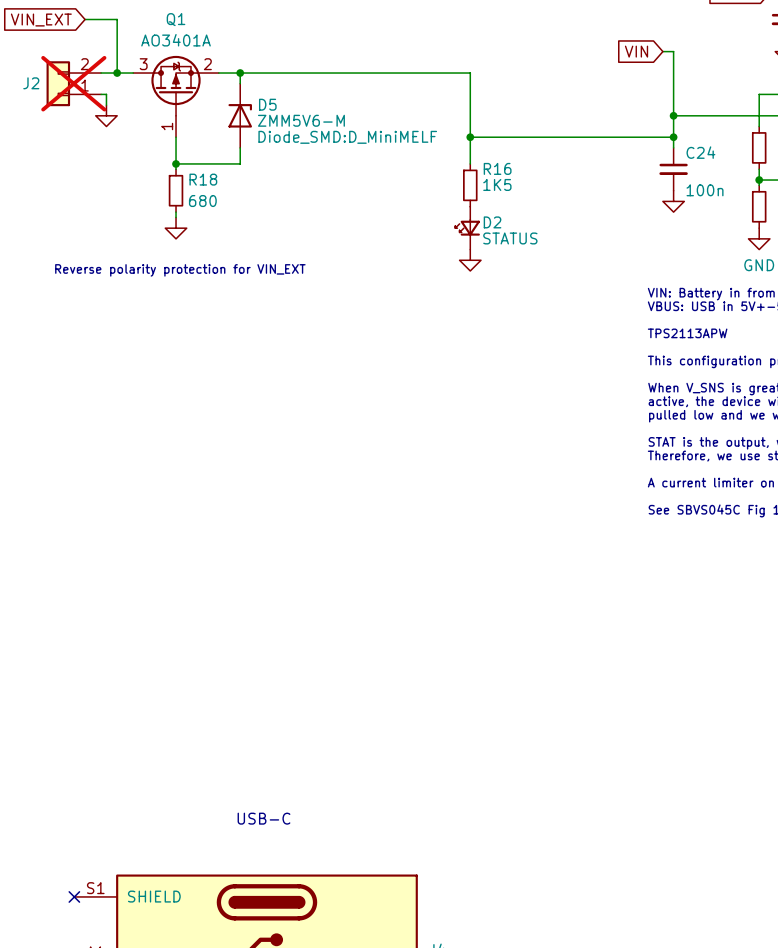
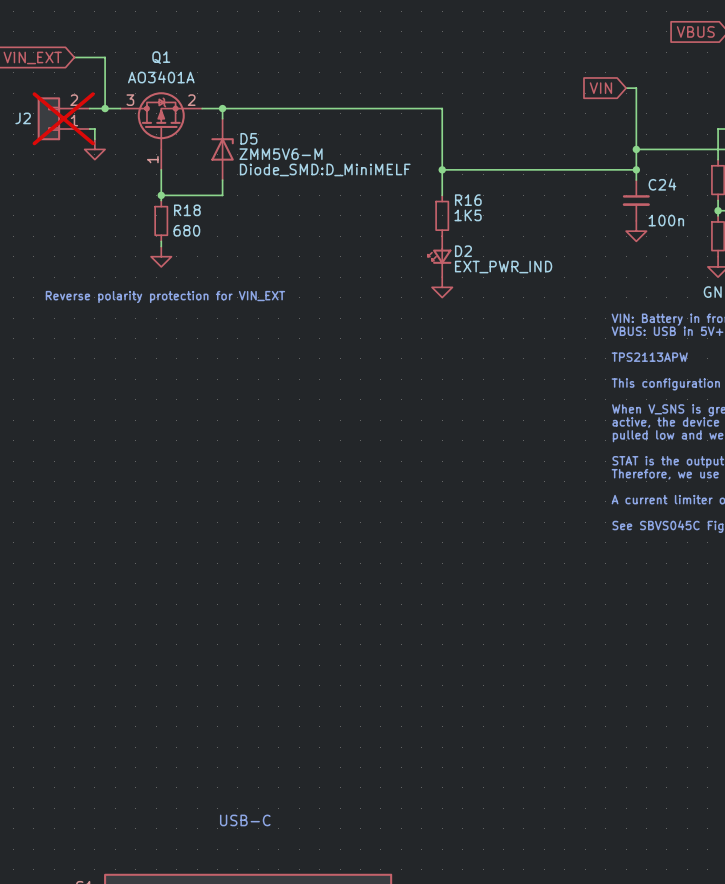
D2 value: STATUS (510, 238) -> EXT_PWR_IND (503, 267)

